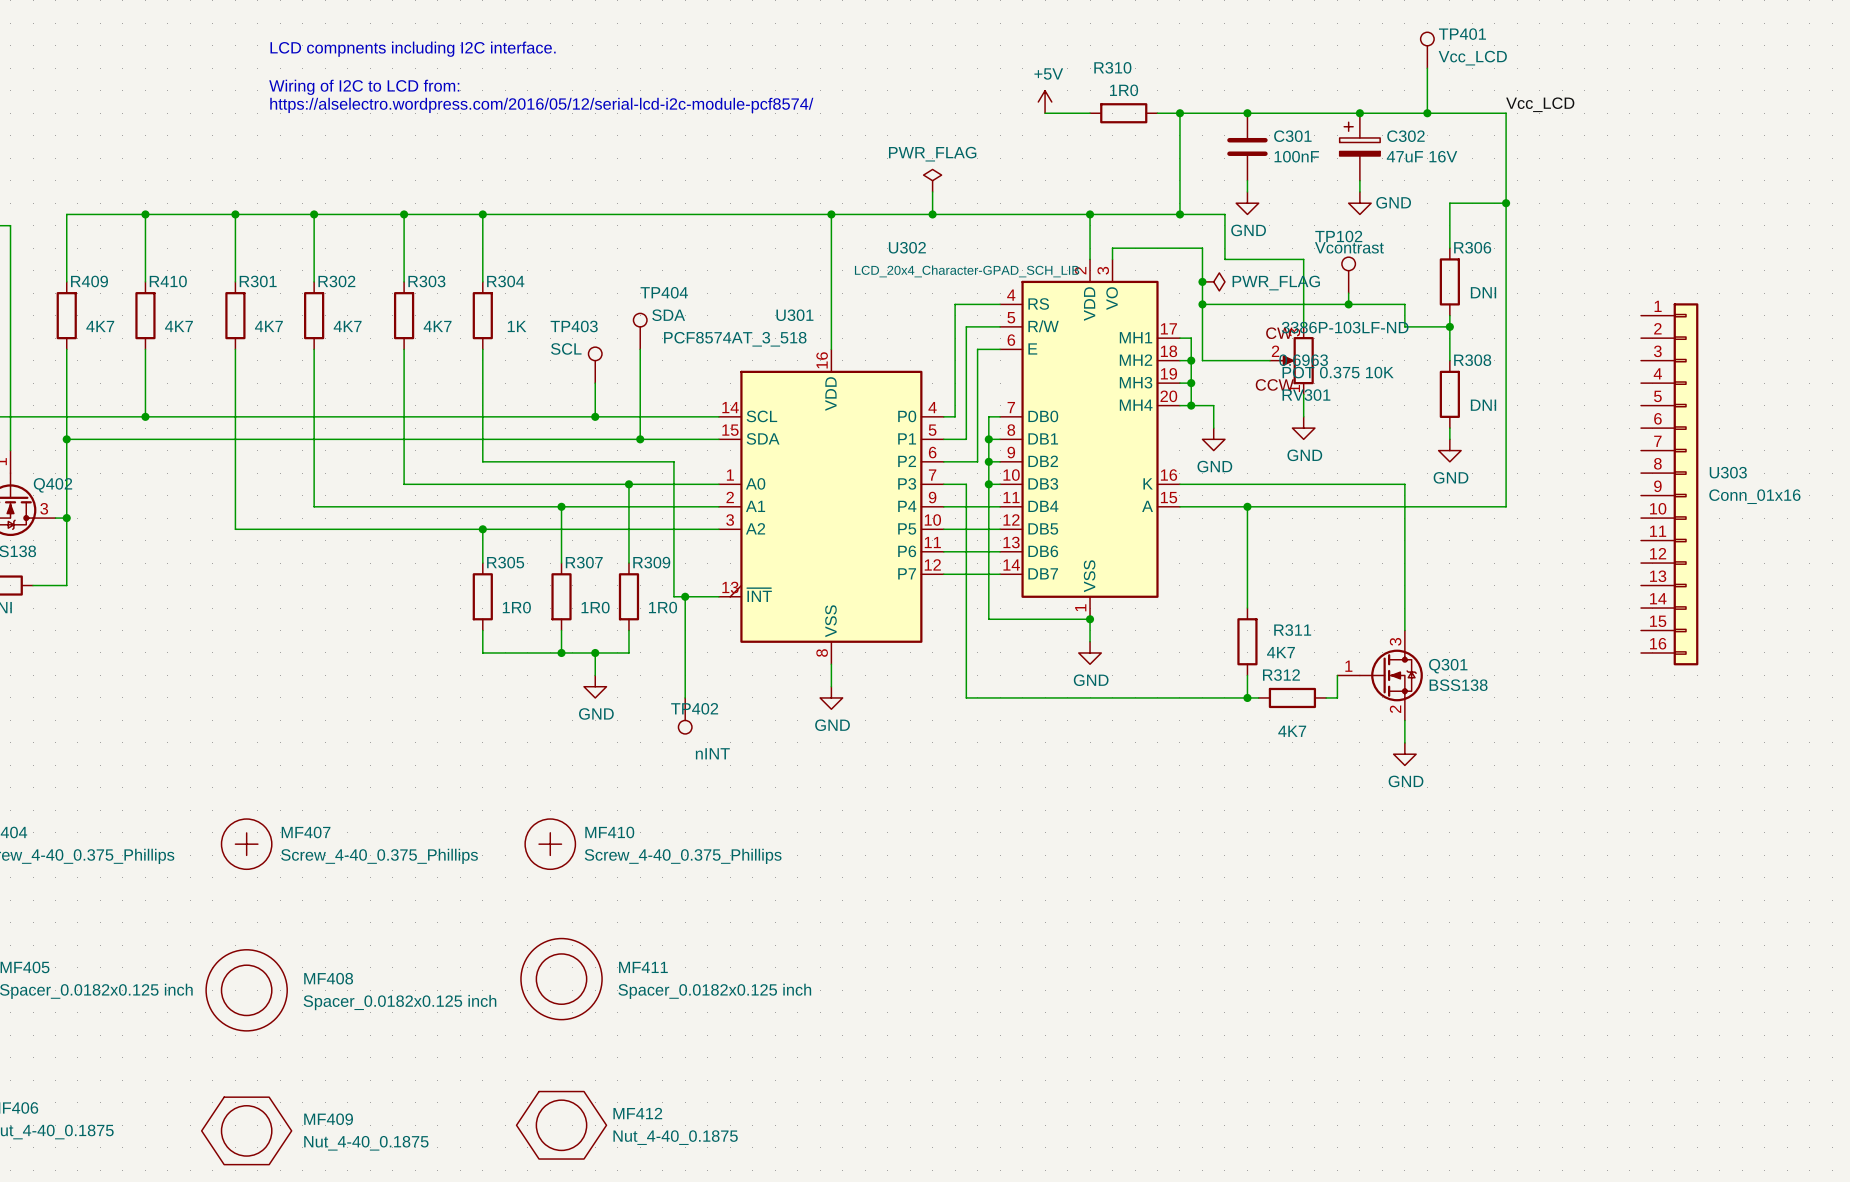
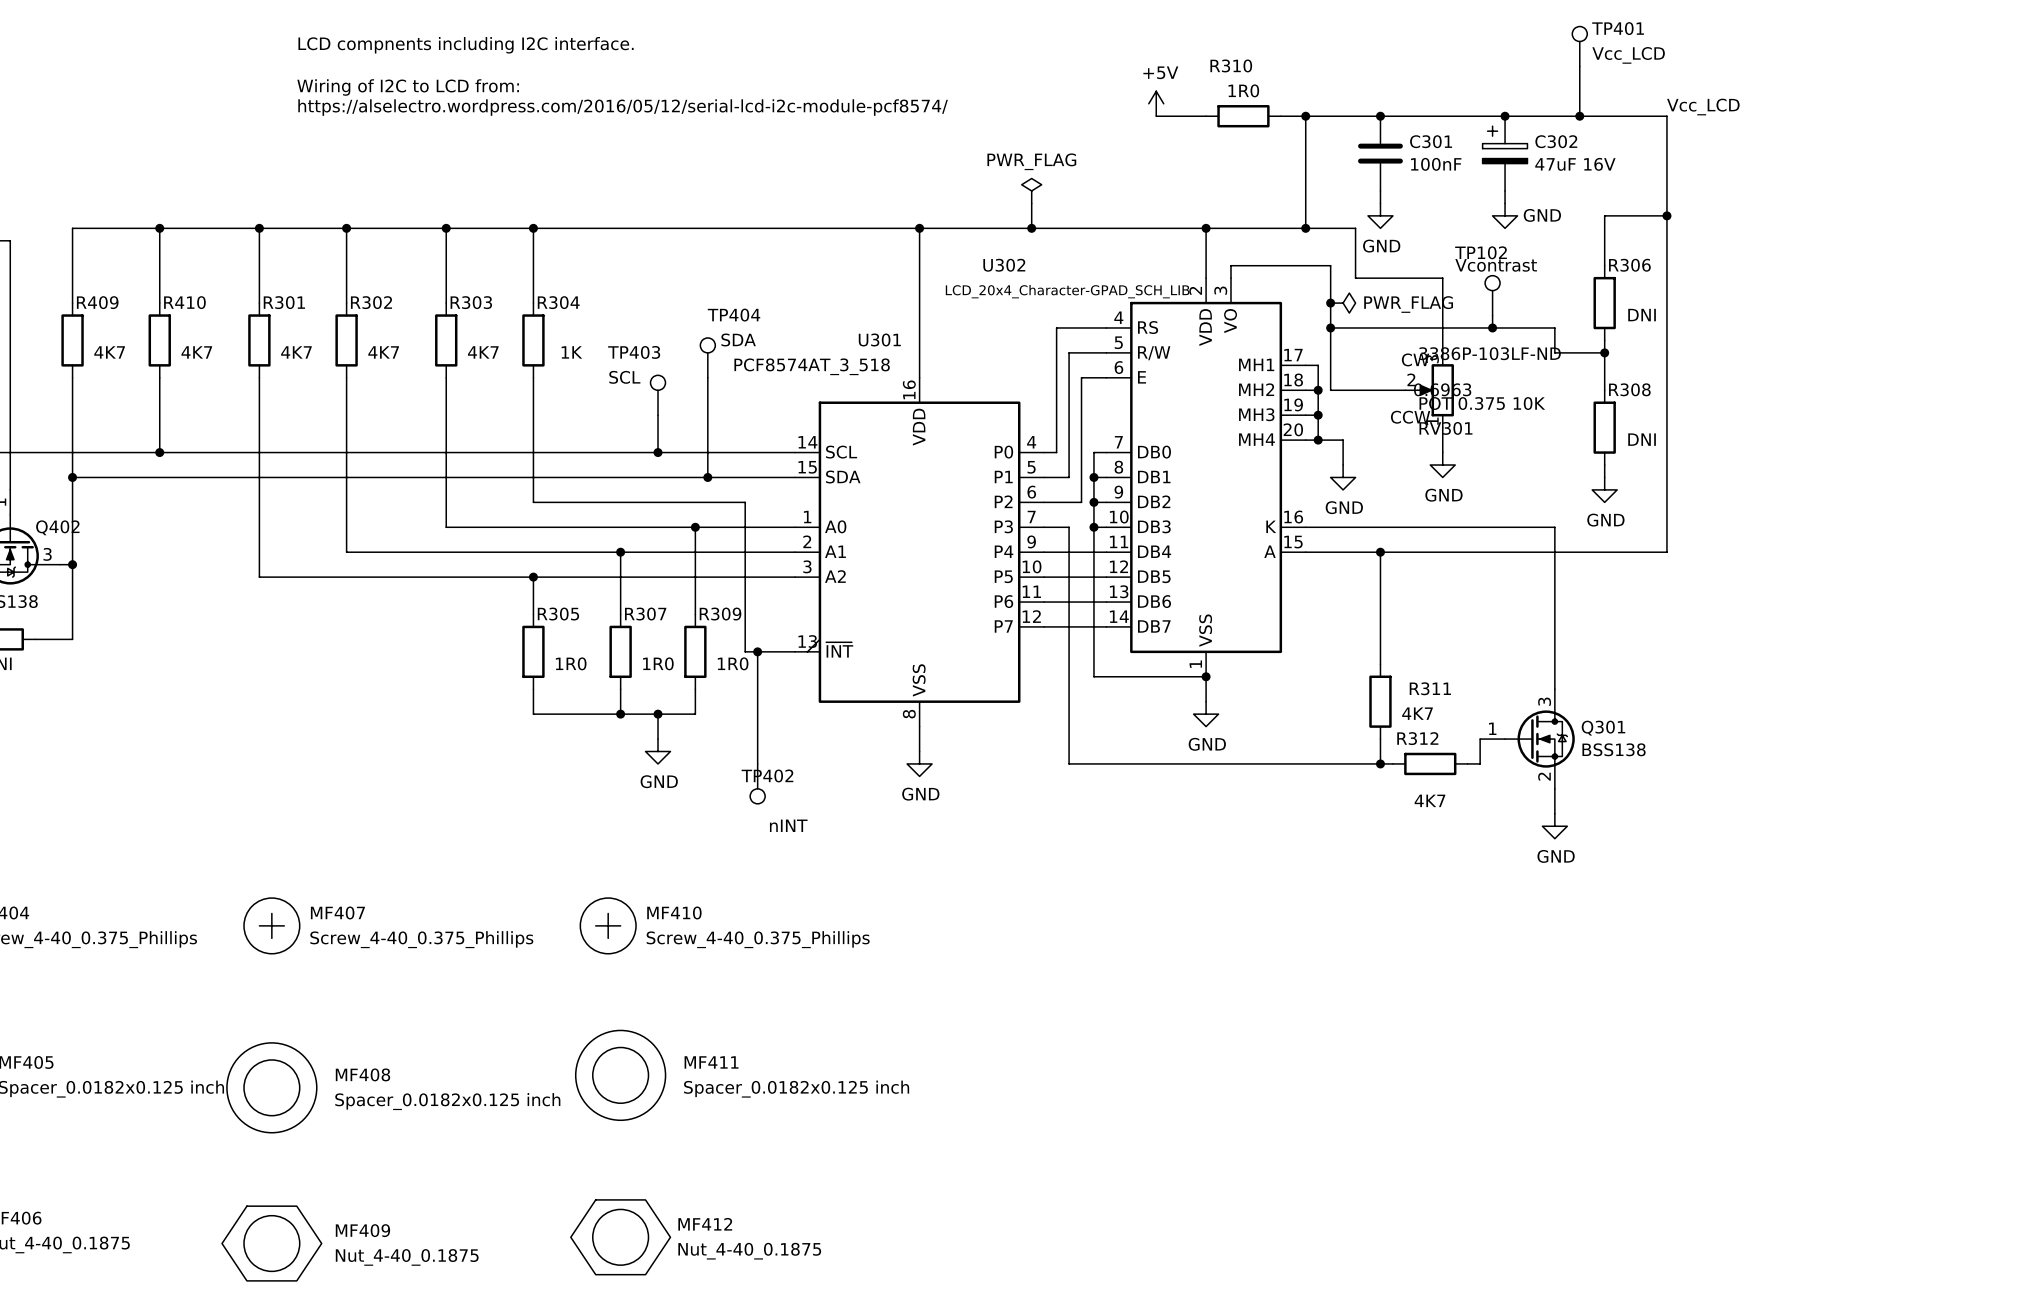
U303: Conn_01x16 (1669, 484) -> none

